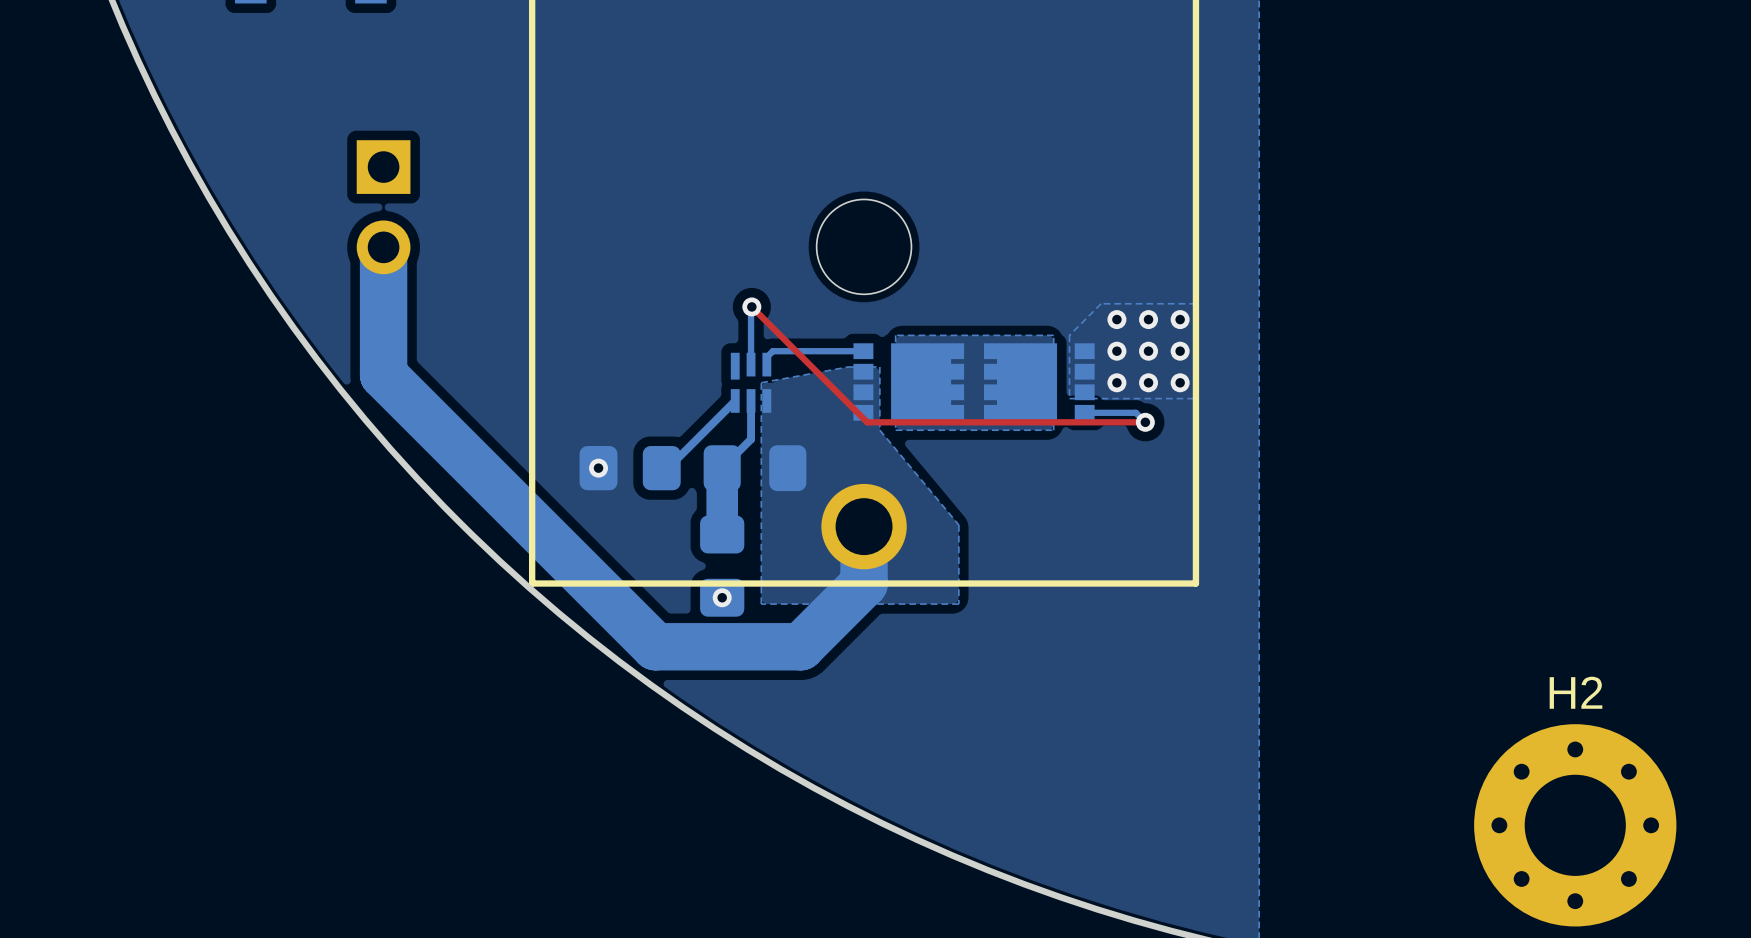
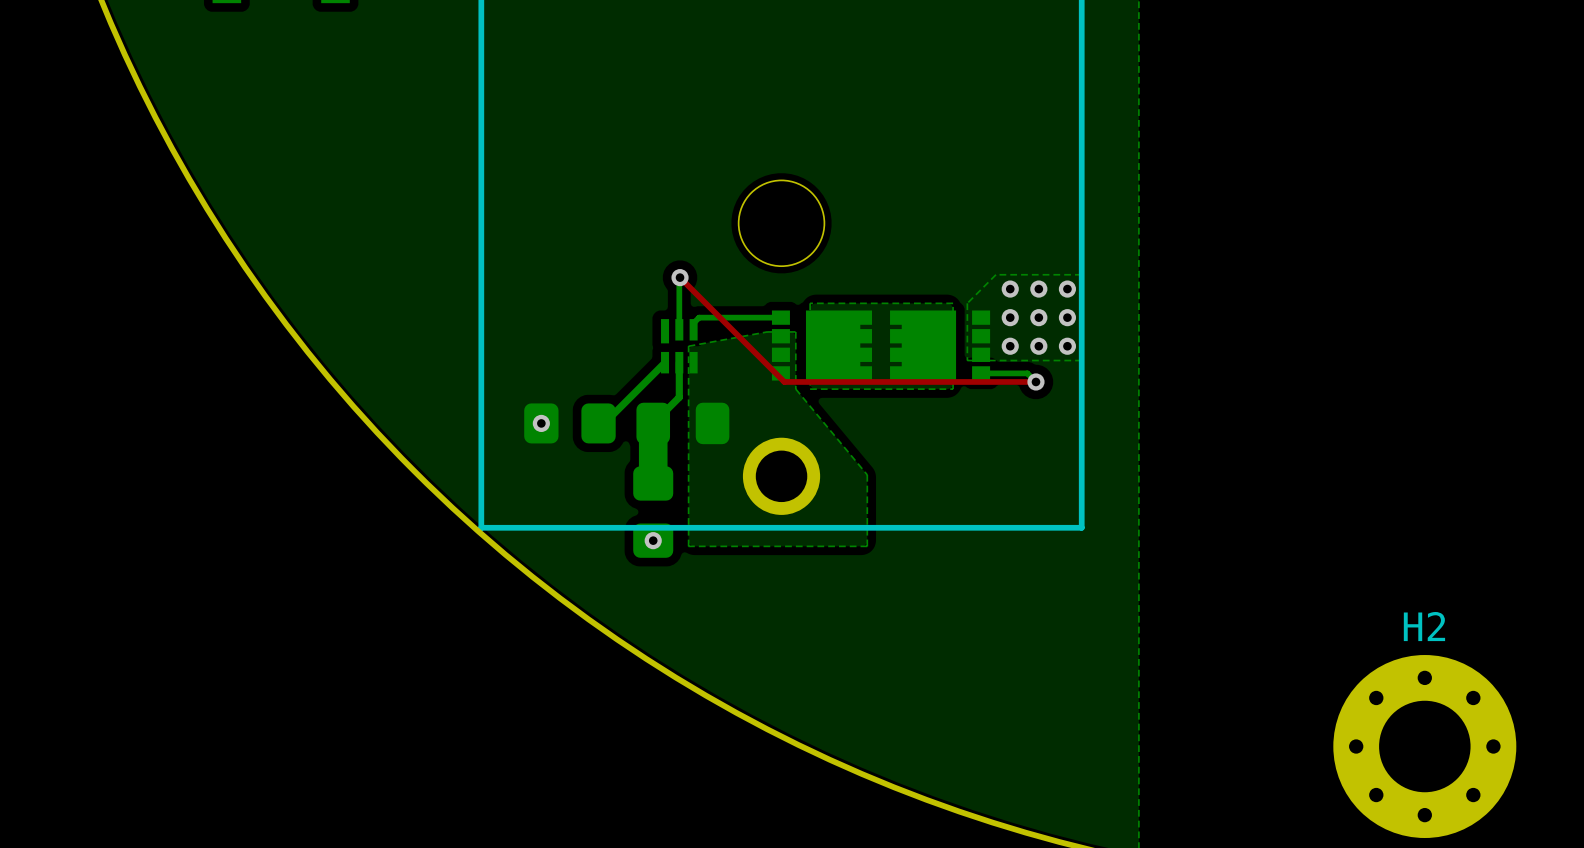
part: (383, 207) -> none
bottom track: (383, 247) (383, 374) (655, 646) (800, 646) (864, 583) (864, 526) -> none

